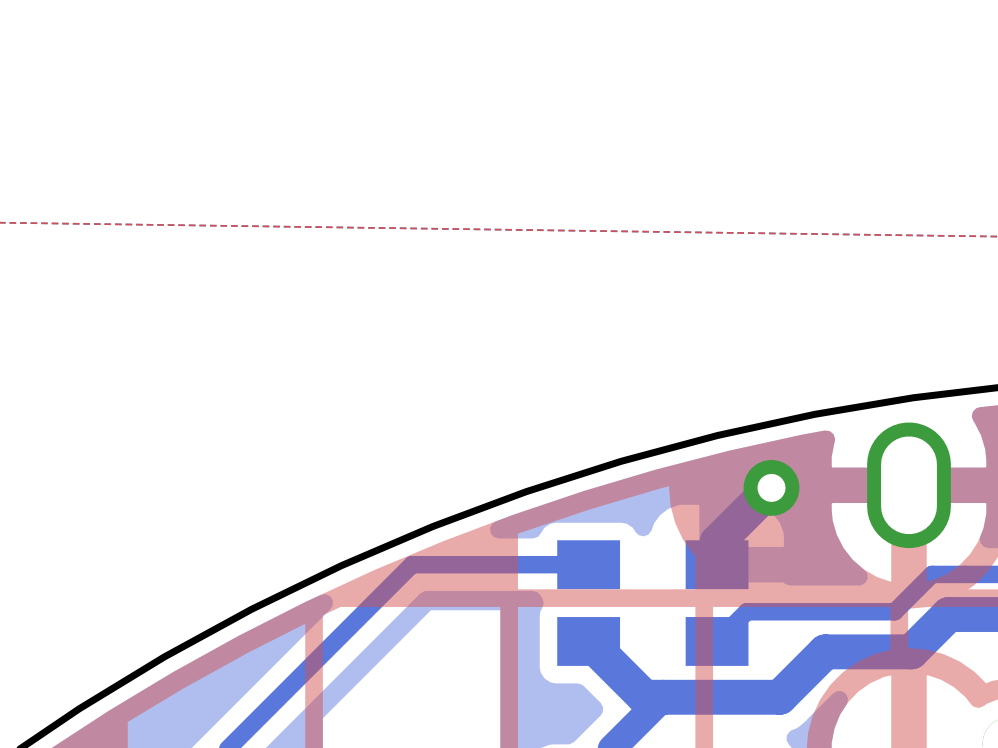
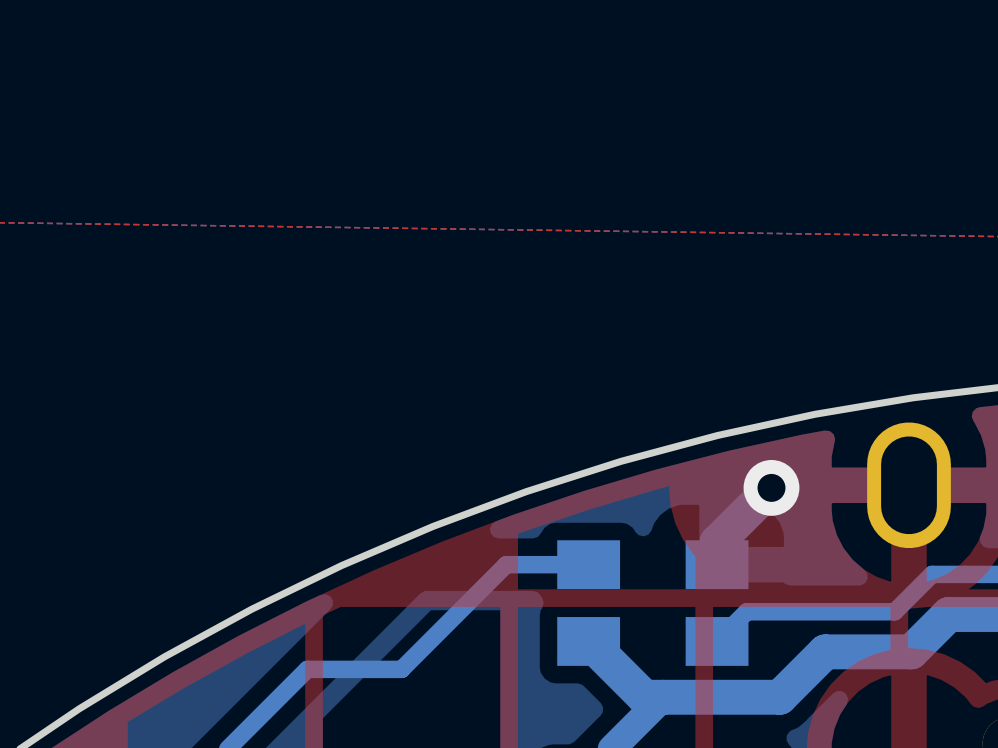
bottom track: (506, 564) (412, 564) (307, 669) -> (506, 564) (401, 669) (307, 669)

